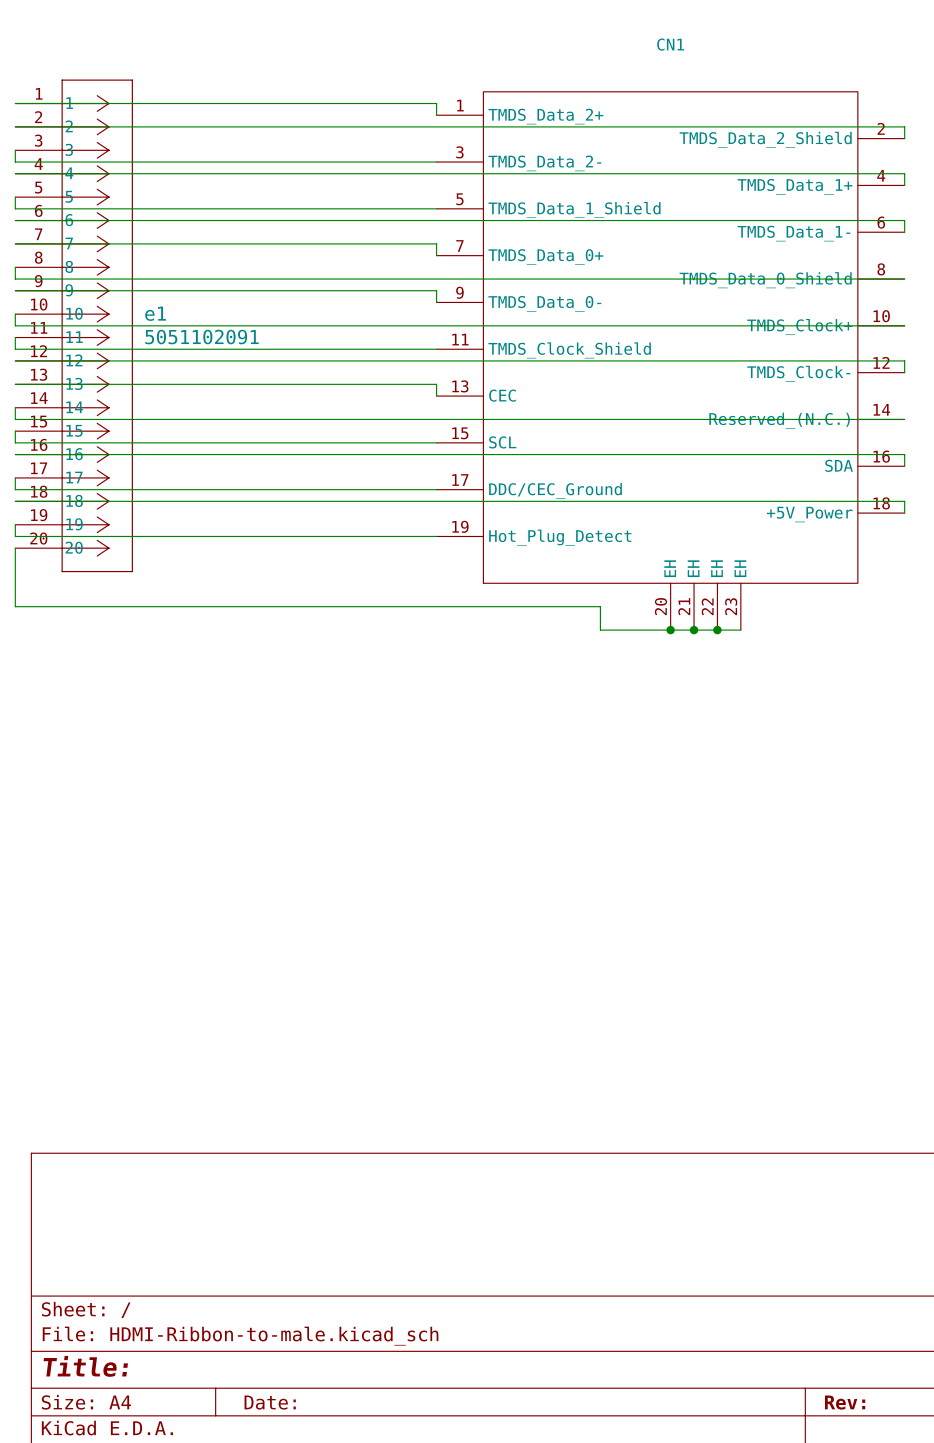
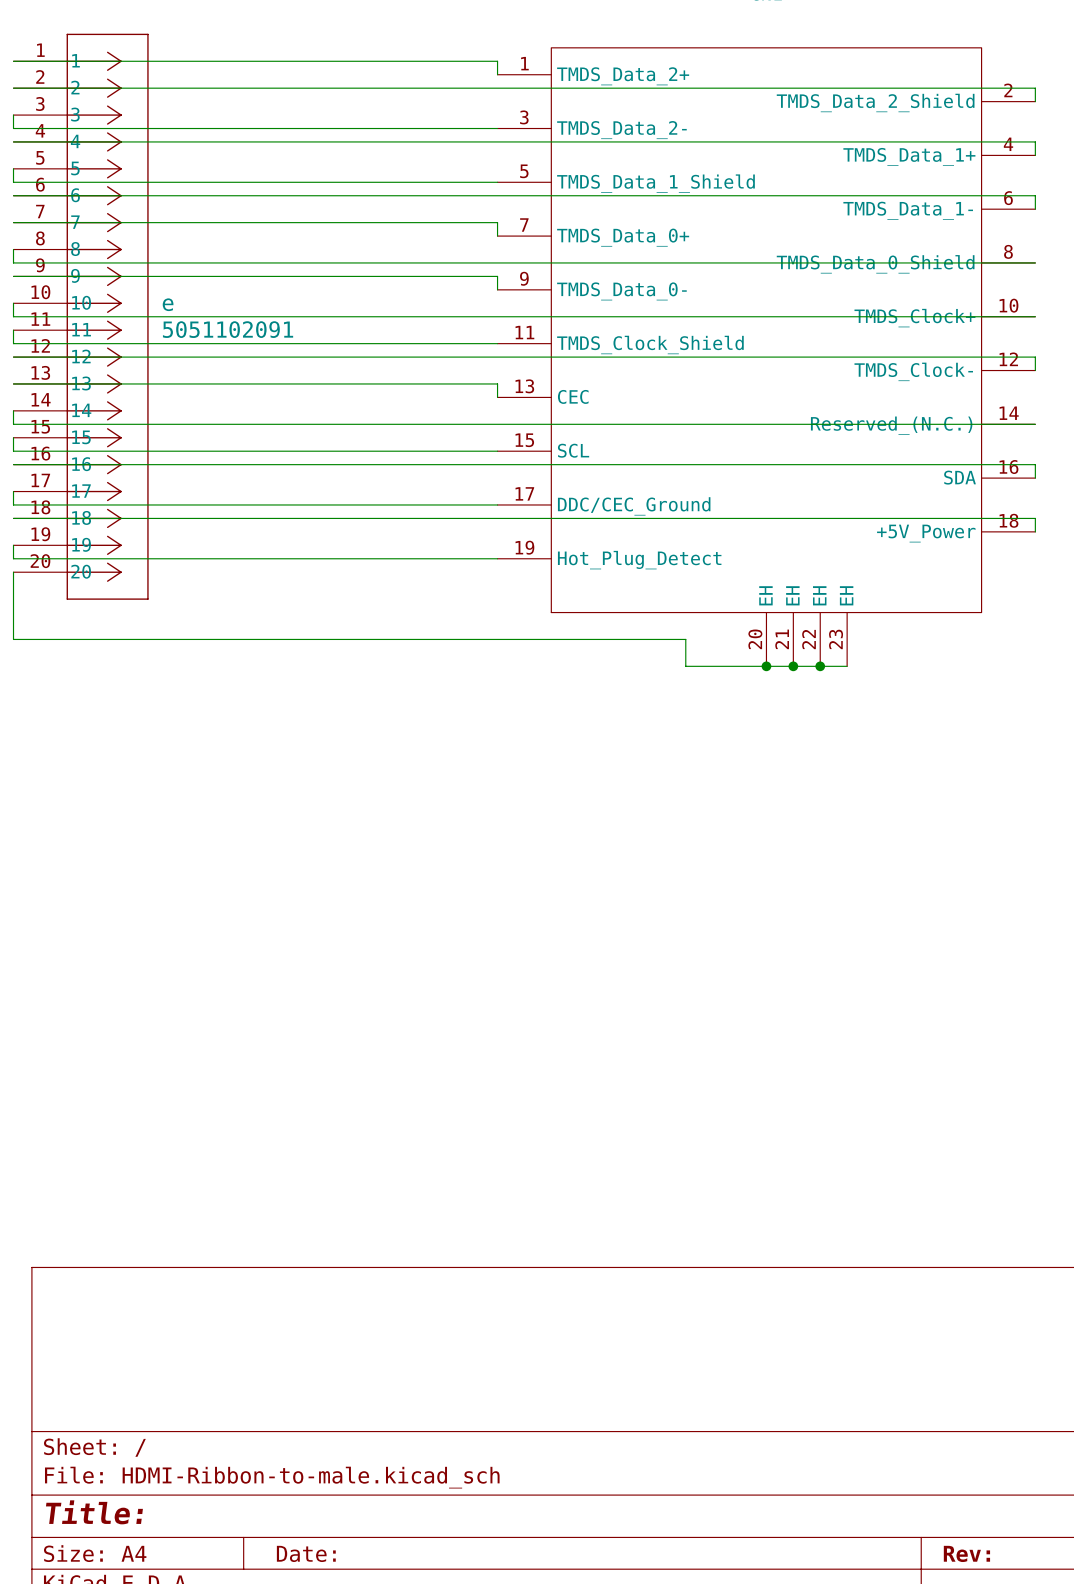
e1 name: e1 (155, 313) -> e (168, 304)

